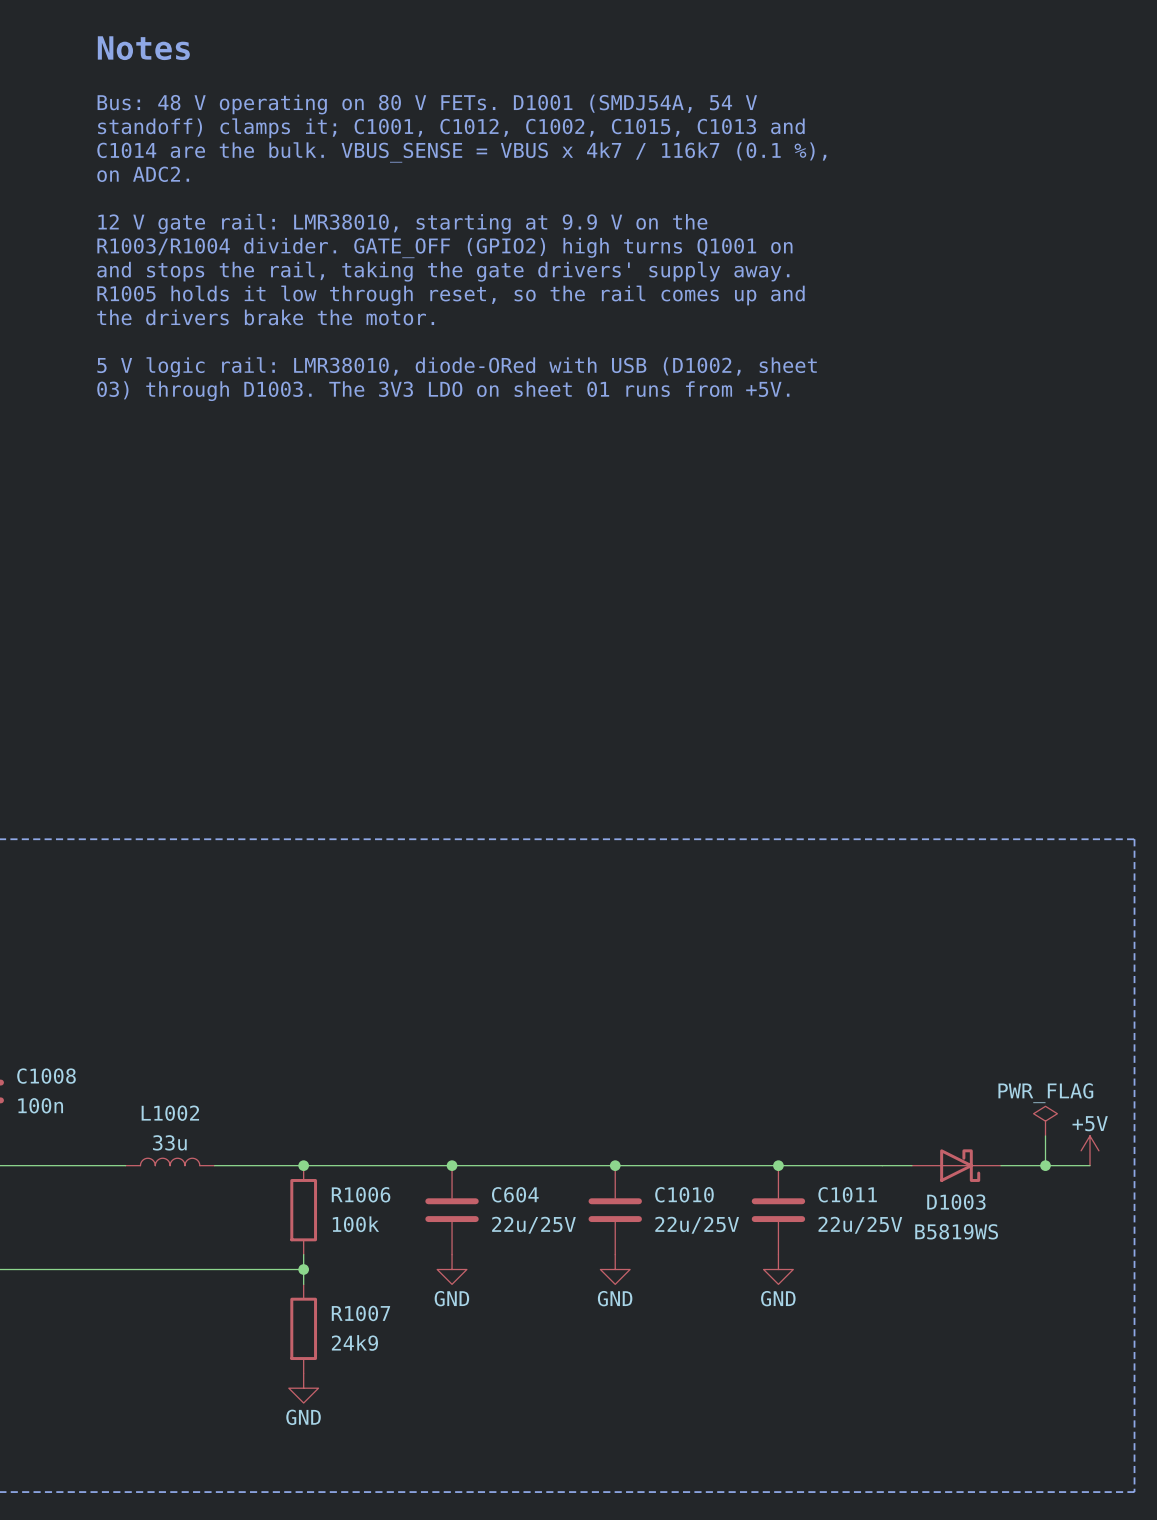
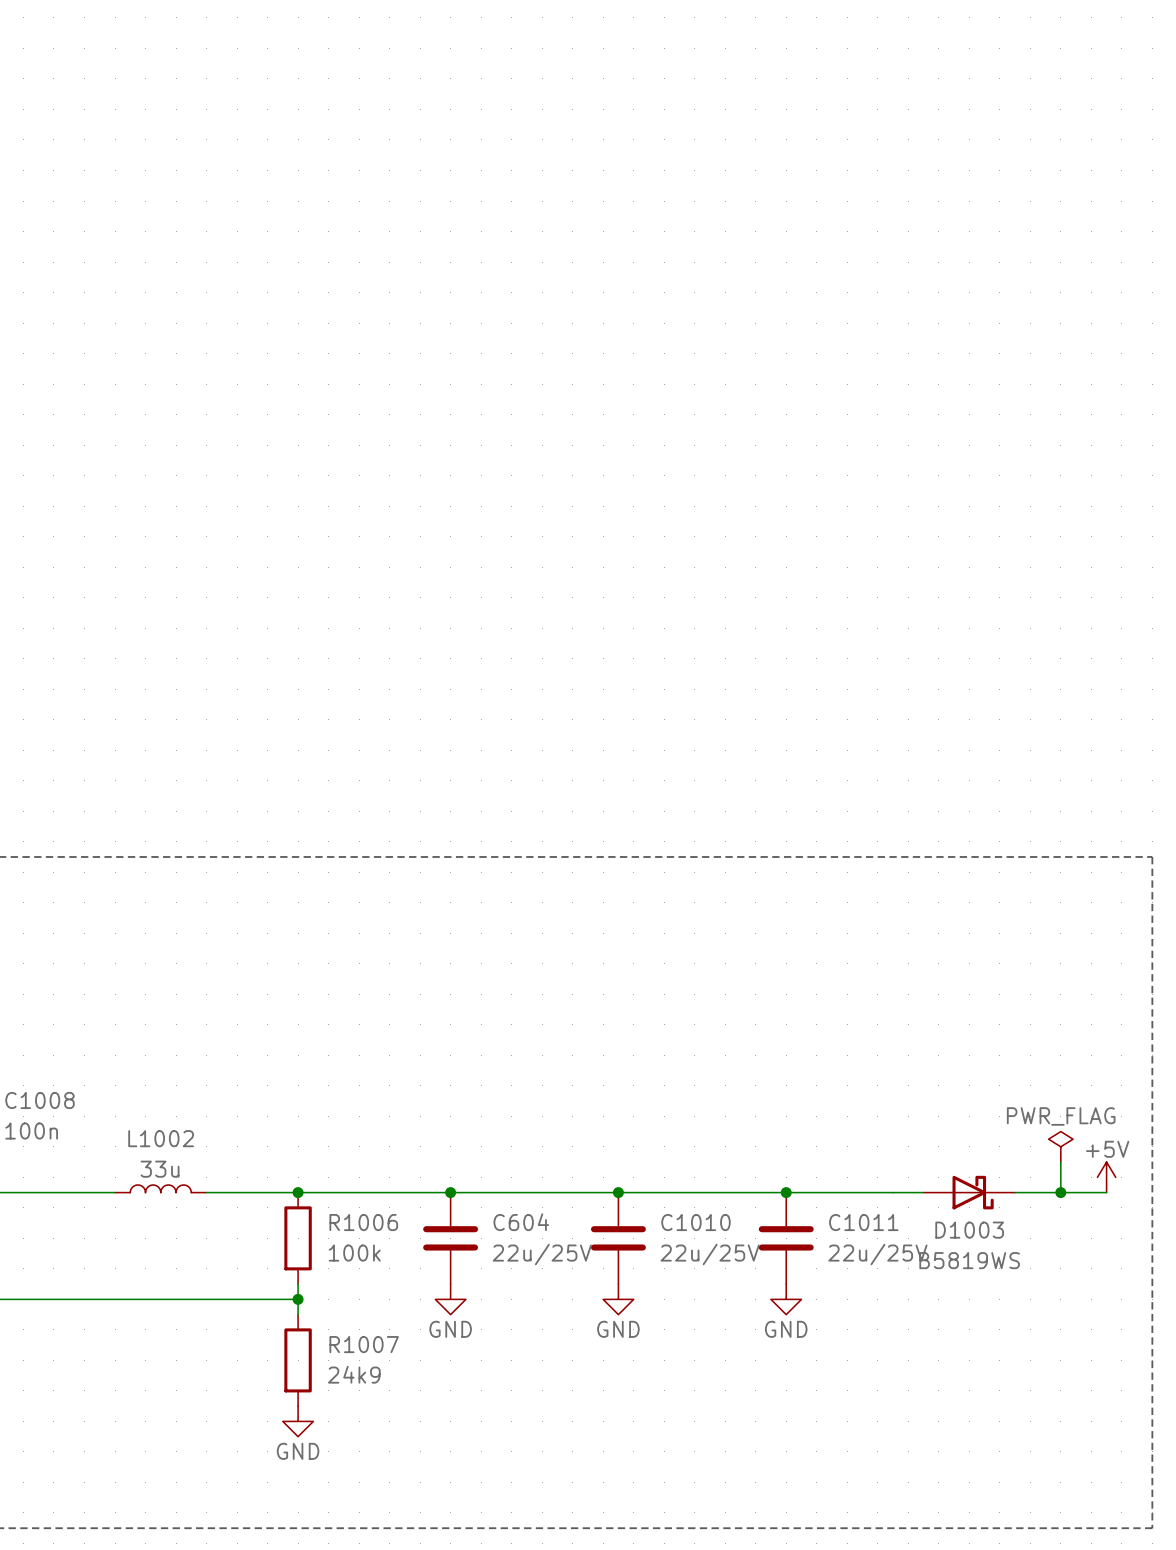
text: Notes (143, 48) -> none
text: Bus: 48 V operating on 80 V FETs. D1001 (SMDJ54A, 54 V (427, 104) -> none
text: standoff) clamps it; C1001, C1012, C1002, C1015, C1013 and (451, 128) -> none
text: C1014 are the bulk. VBUS_SENSE = VBUS x 4k7 / 116k7 (0.1 %), (461, 152) -> none
text: on ADC2. (143, 174) -> none
text: 12 V gate rail: LMR38010, starting at 9.9 V on the (402, 223) -> none
text: R1003/R1004 divider. GATE_OFF (GPIO2) high turns Q1001 on (444, 248) -> none
text: and stops the rail, taking the gate drivers' supply away. (443, 271) -> none
text: R1005 holds it low through reset, so the rail comes up and (451, 295) -> none
text: the drivers brake the motor. (265, 317) -> none
text: 5 V logic rail: LMR38010, diode-ORed with USB (D1002, sheet (457, 367) -> none
text: 03) through D1003. The 3V3 LDO on sheet 01 runs from +5V. (443, 391) -> none

